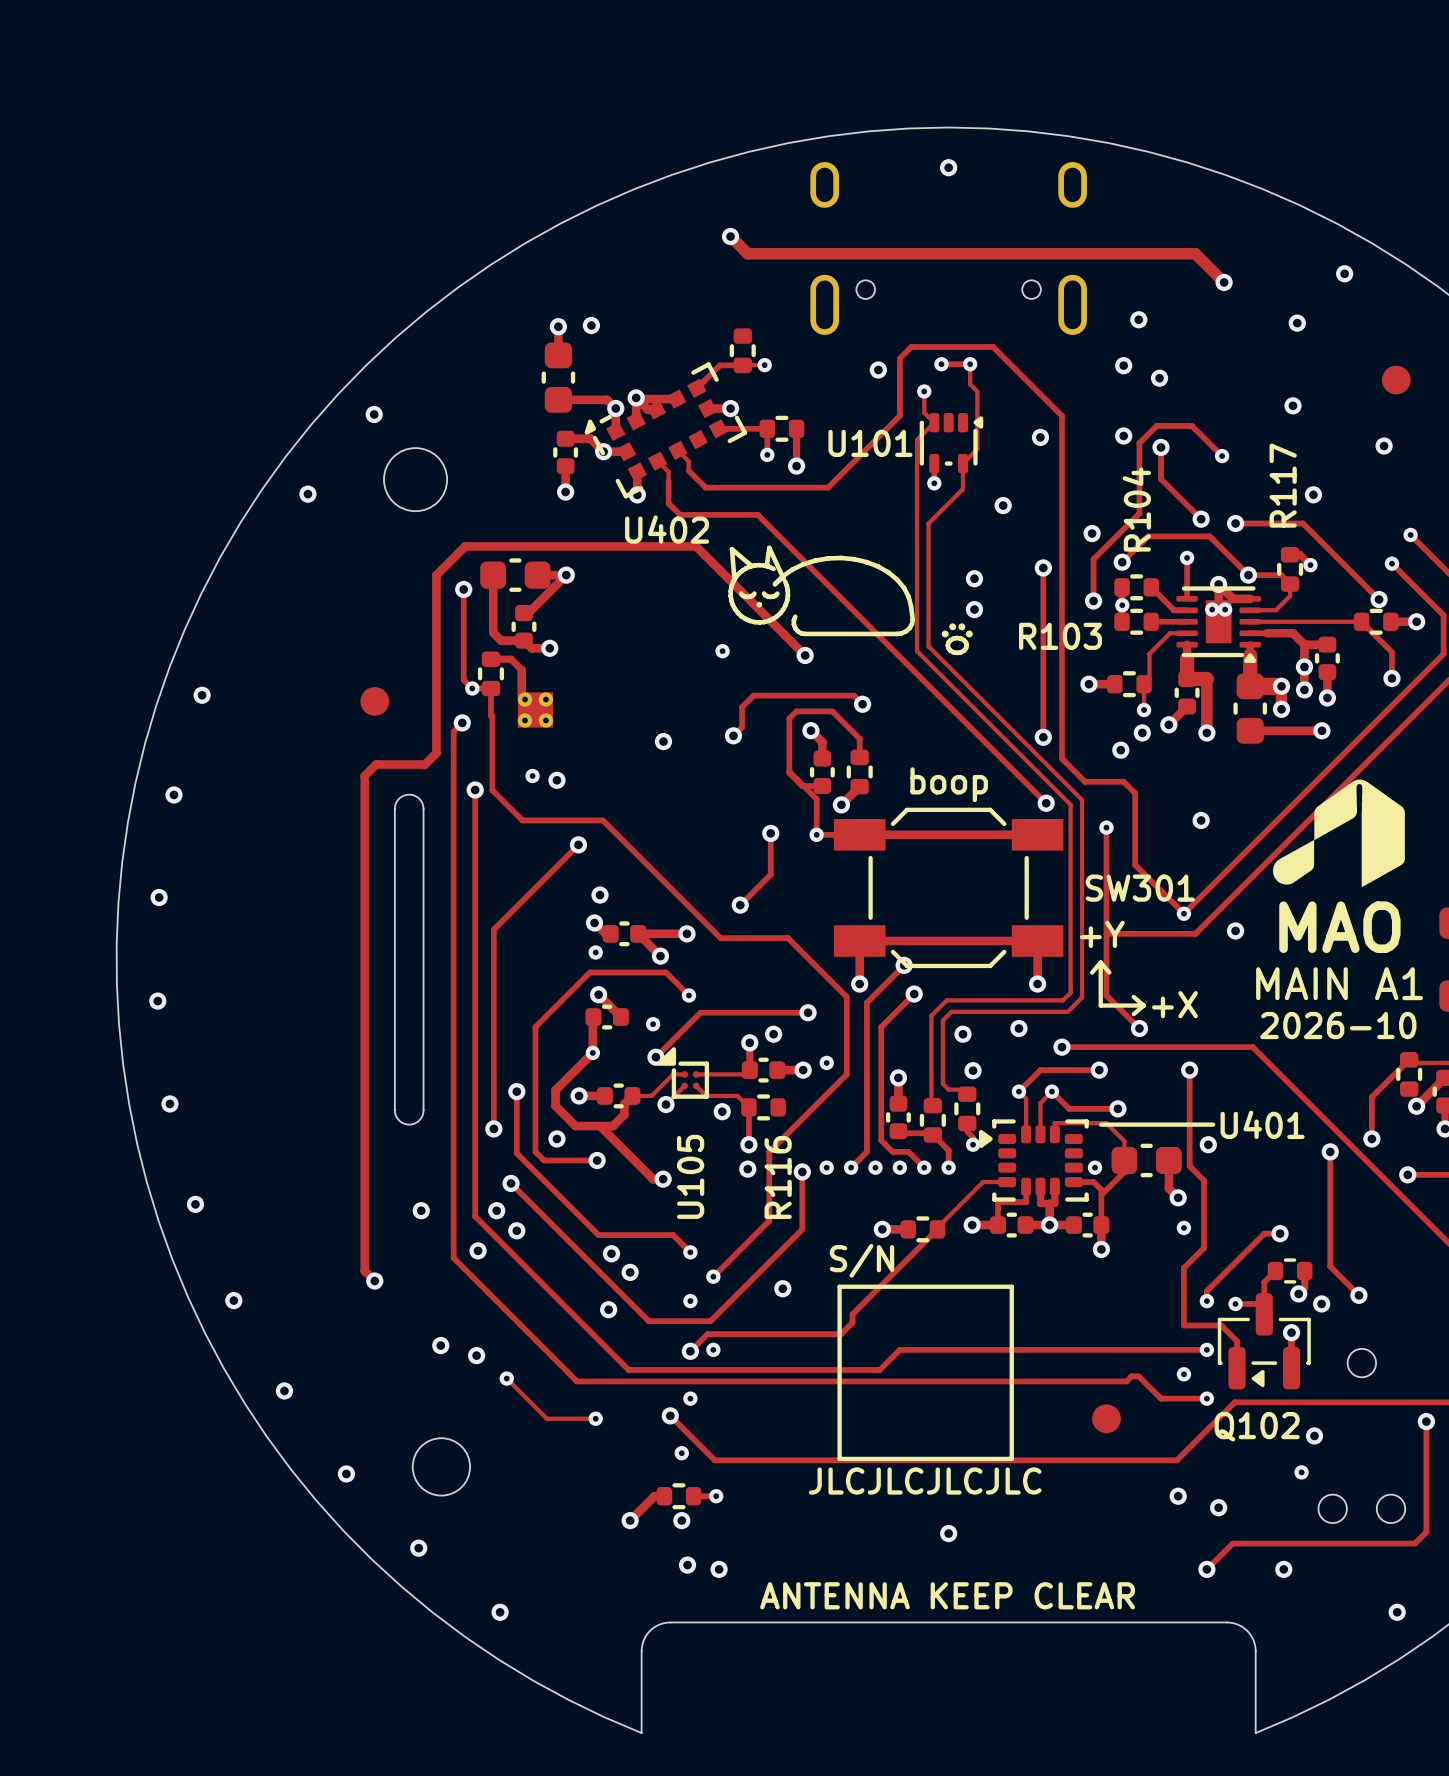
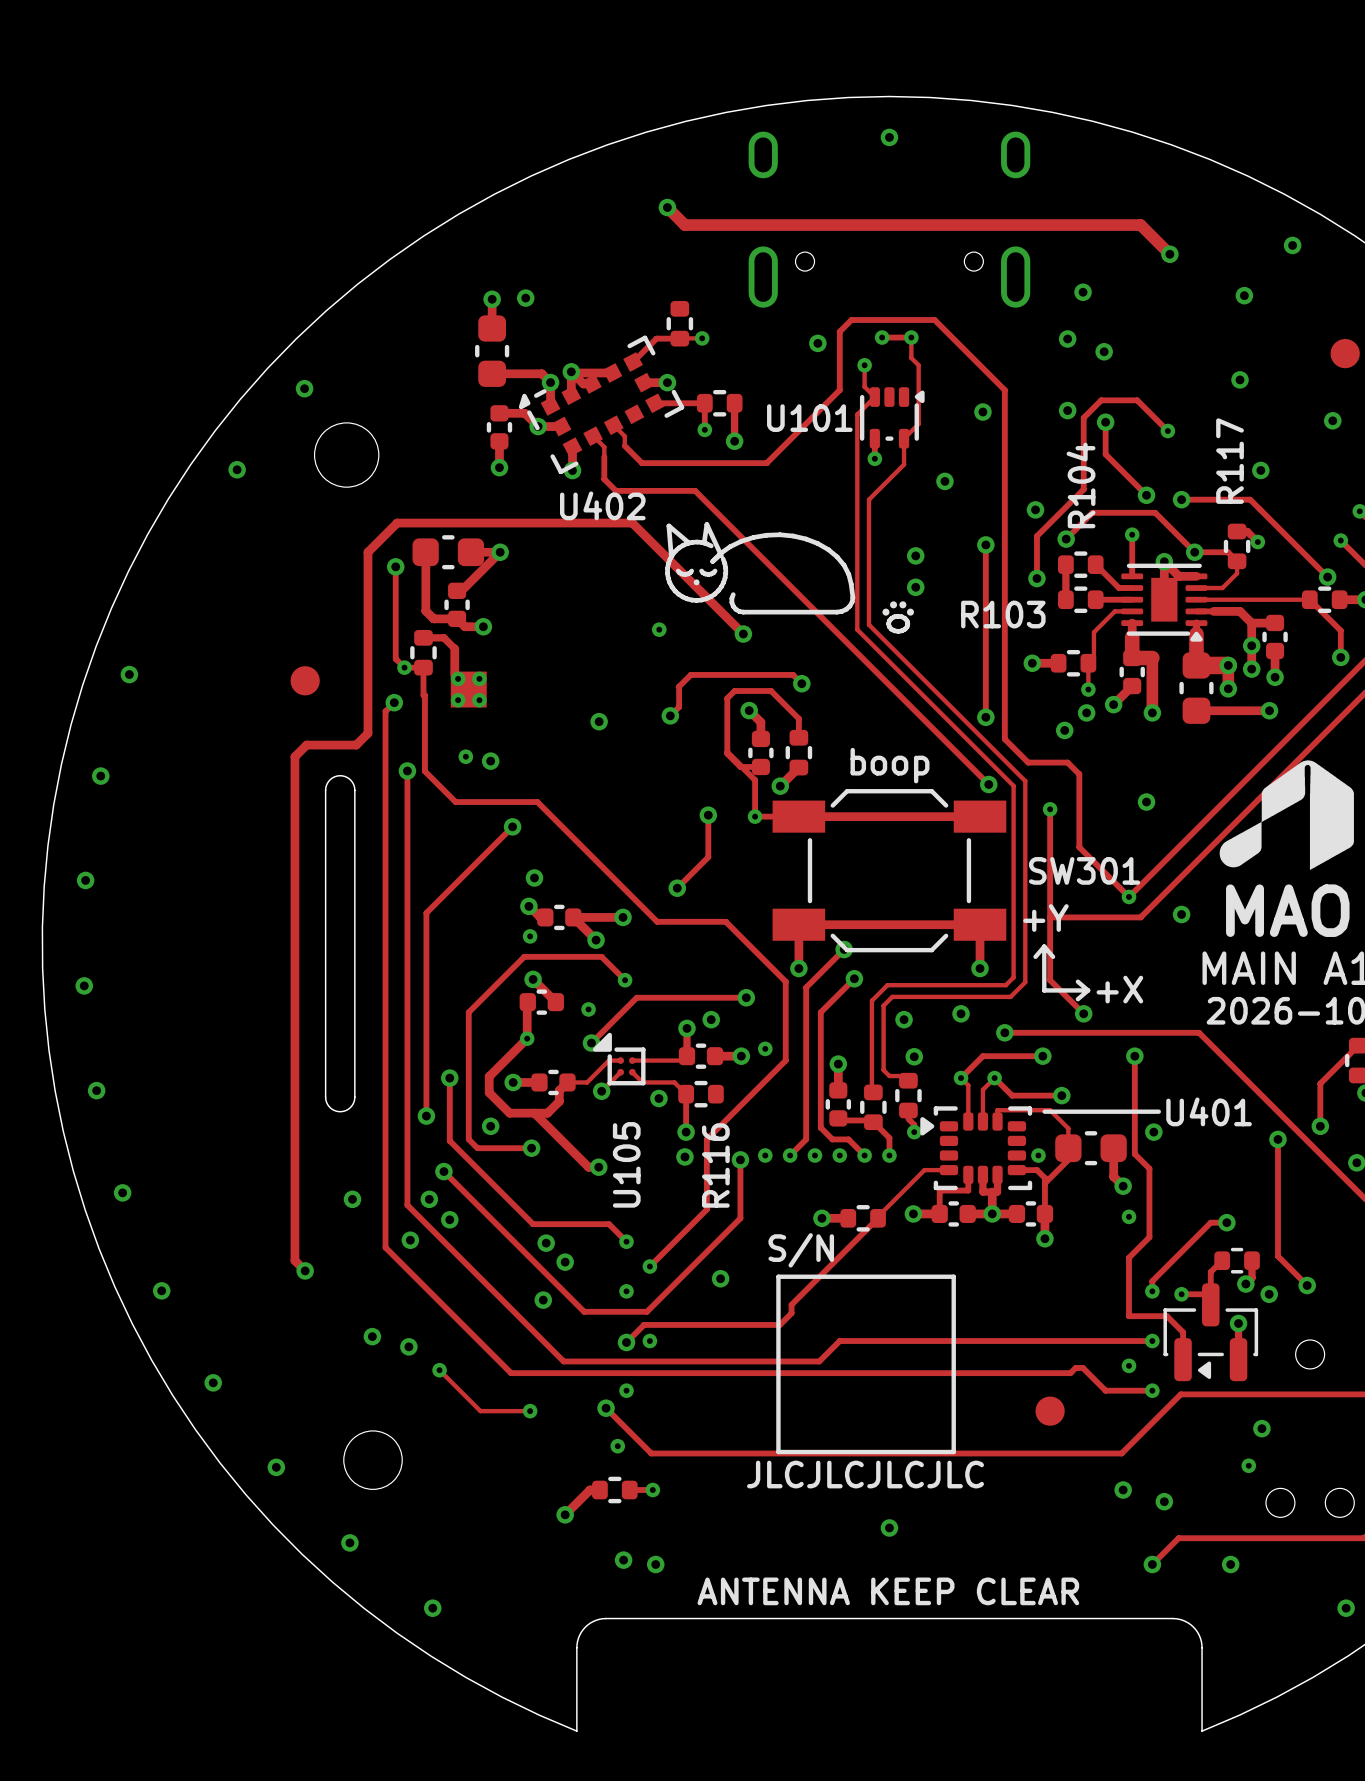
via: (1122, 605) -> none
via: (1212, 609) -> none
via: (1225, 609) -> none
Q102 name: Q102 (1257, 1426) -> none
via: (681, 1520) -> none

